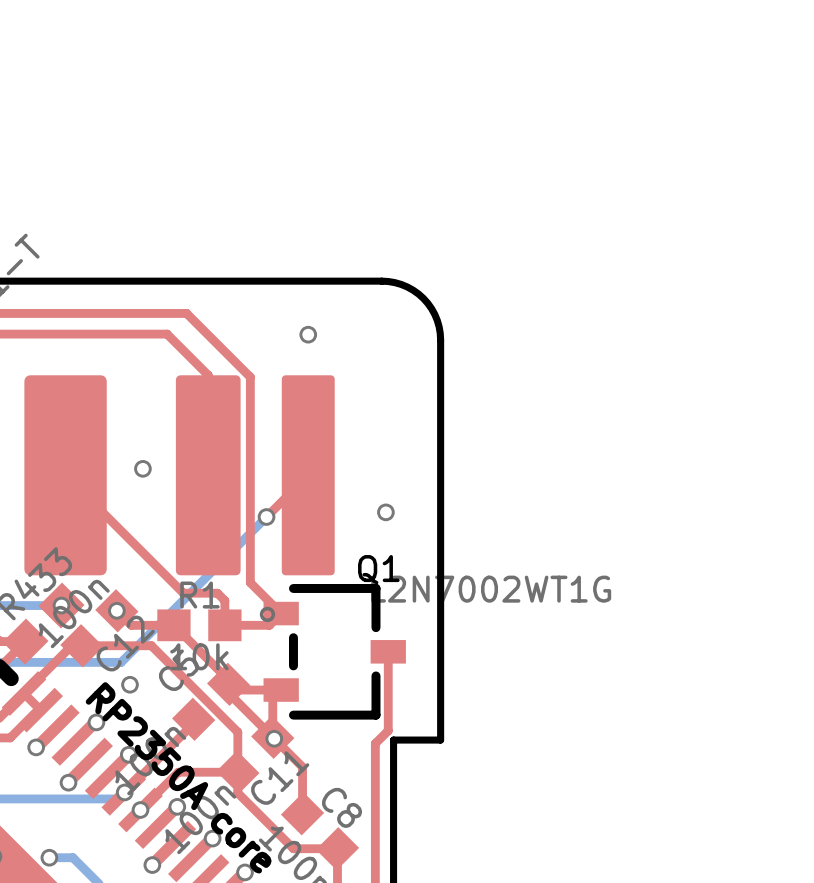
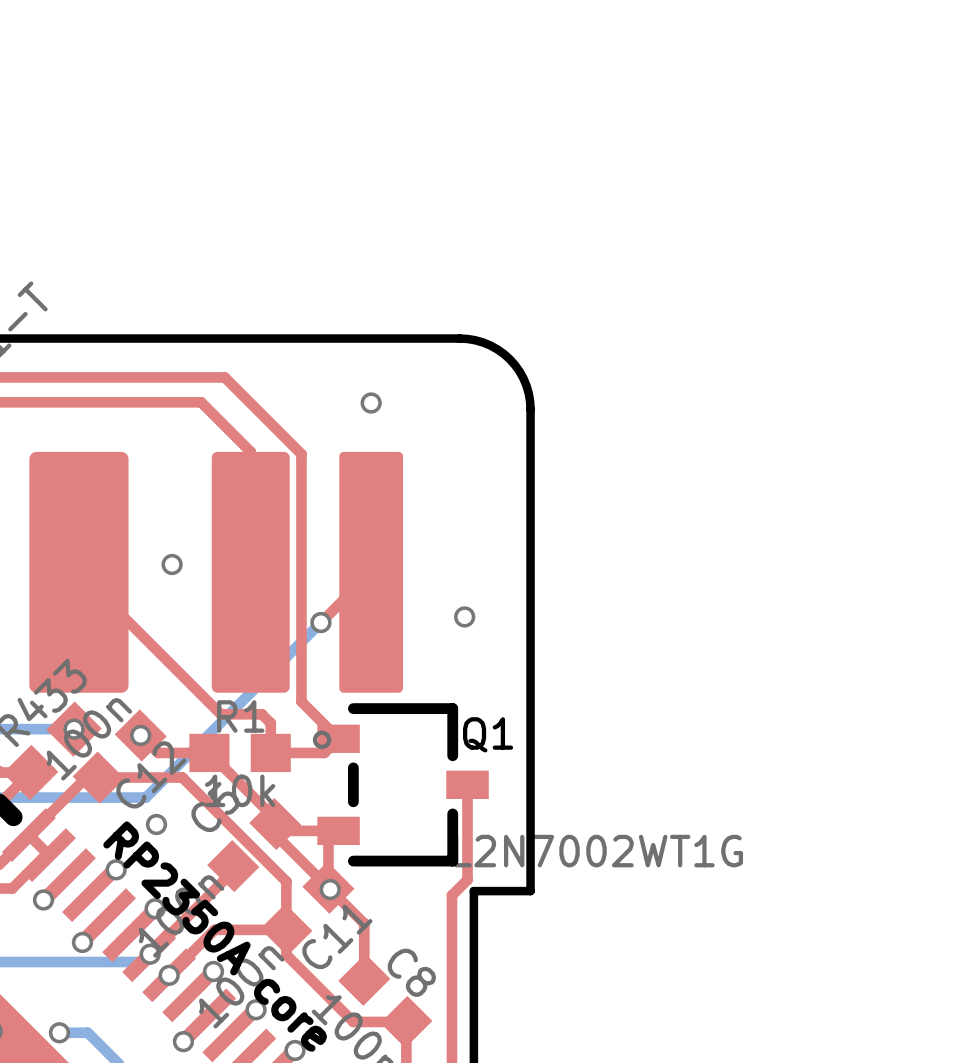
Q1 name position: Q1 (378, 569) -> Q1 (488, 734)
Q1 value position: L2N7002WT1G (491, 589) -> L2N7002WT1G (598, 851)

